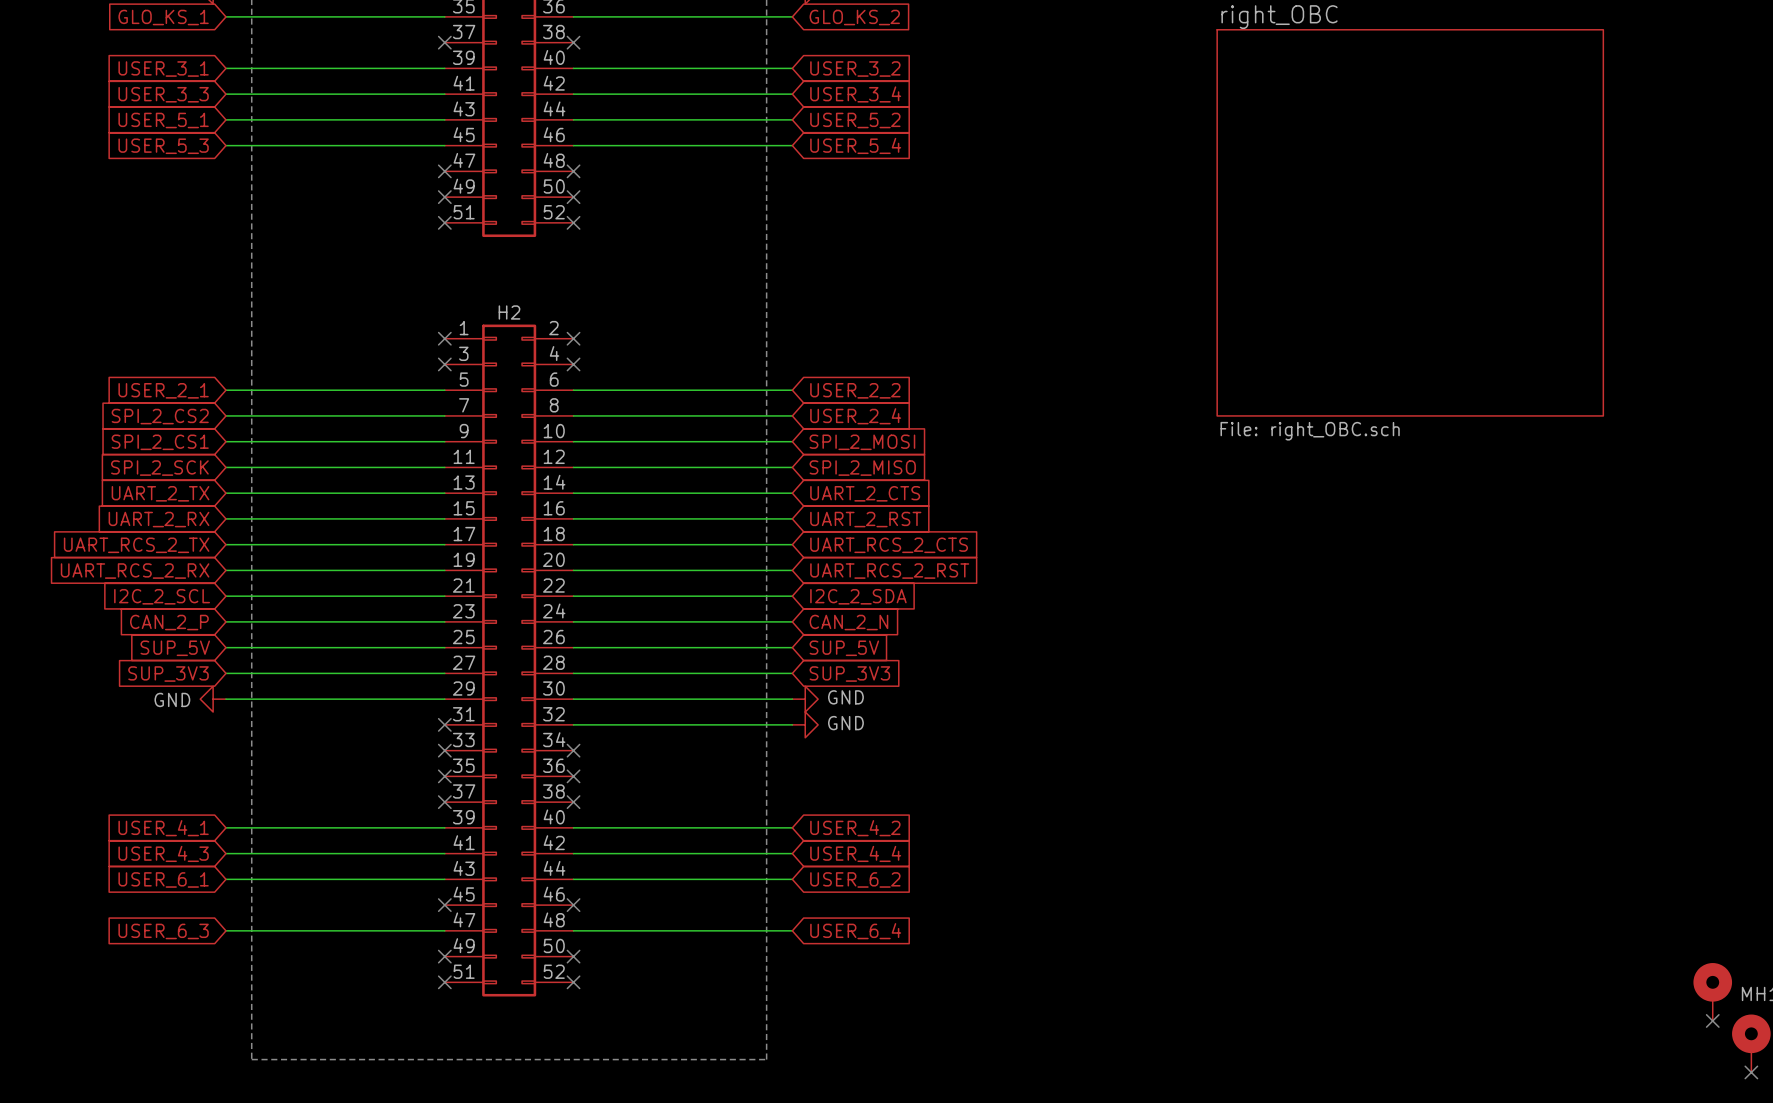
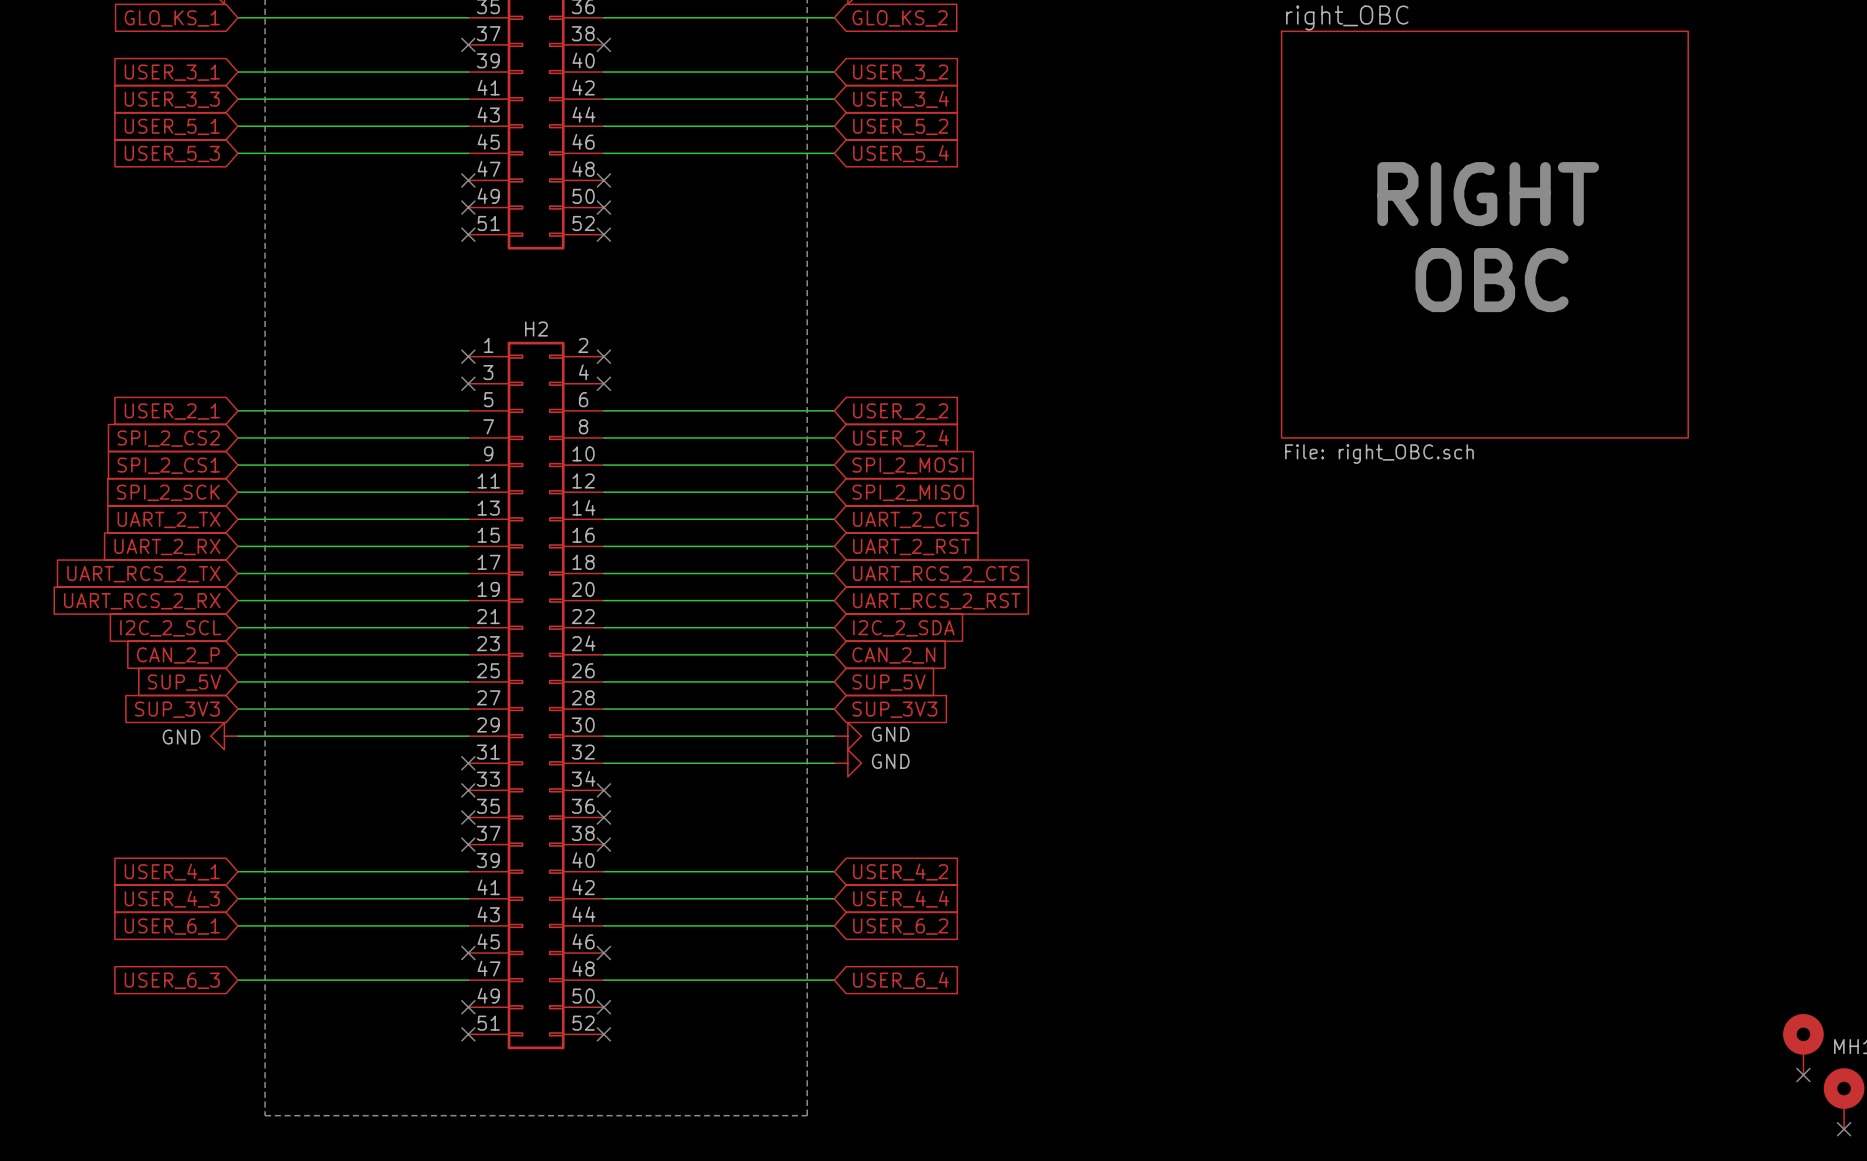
text: none -> RIGHT (1488, 194)
text: none -> OBC (1492, 280)

